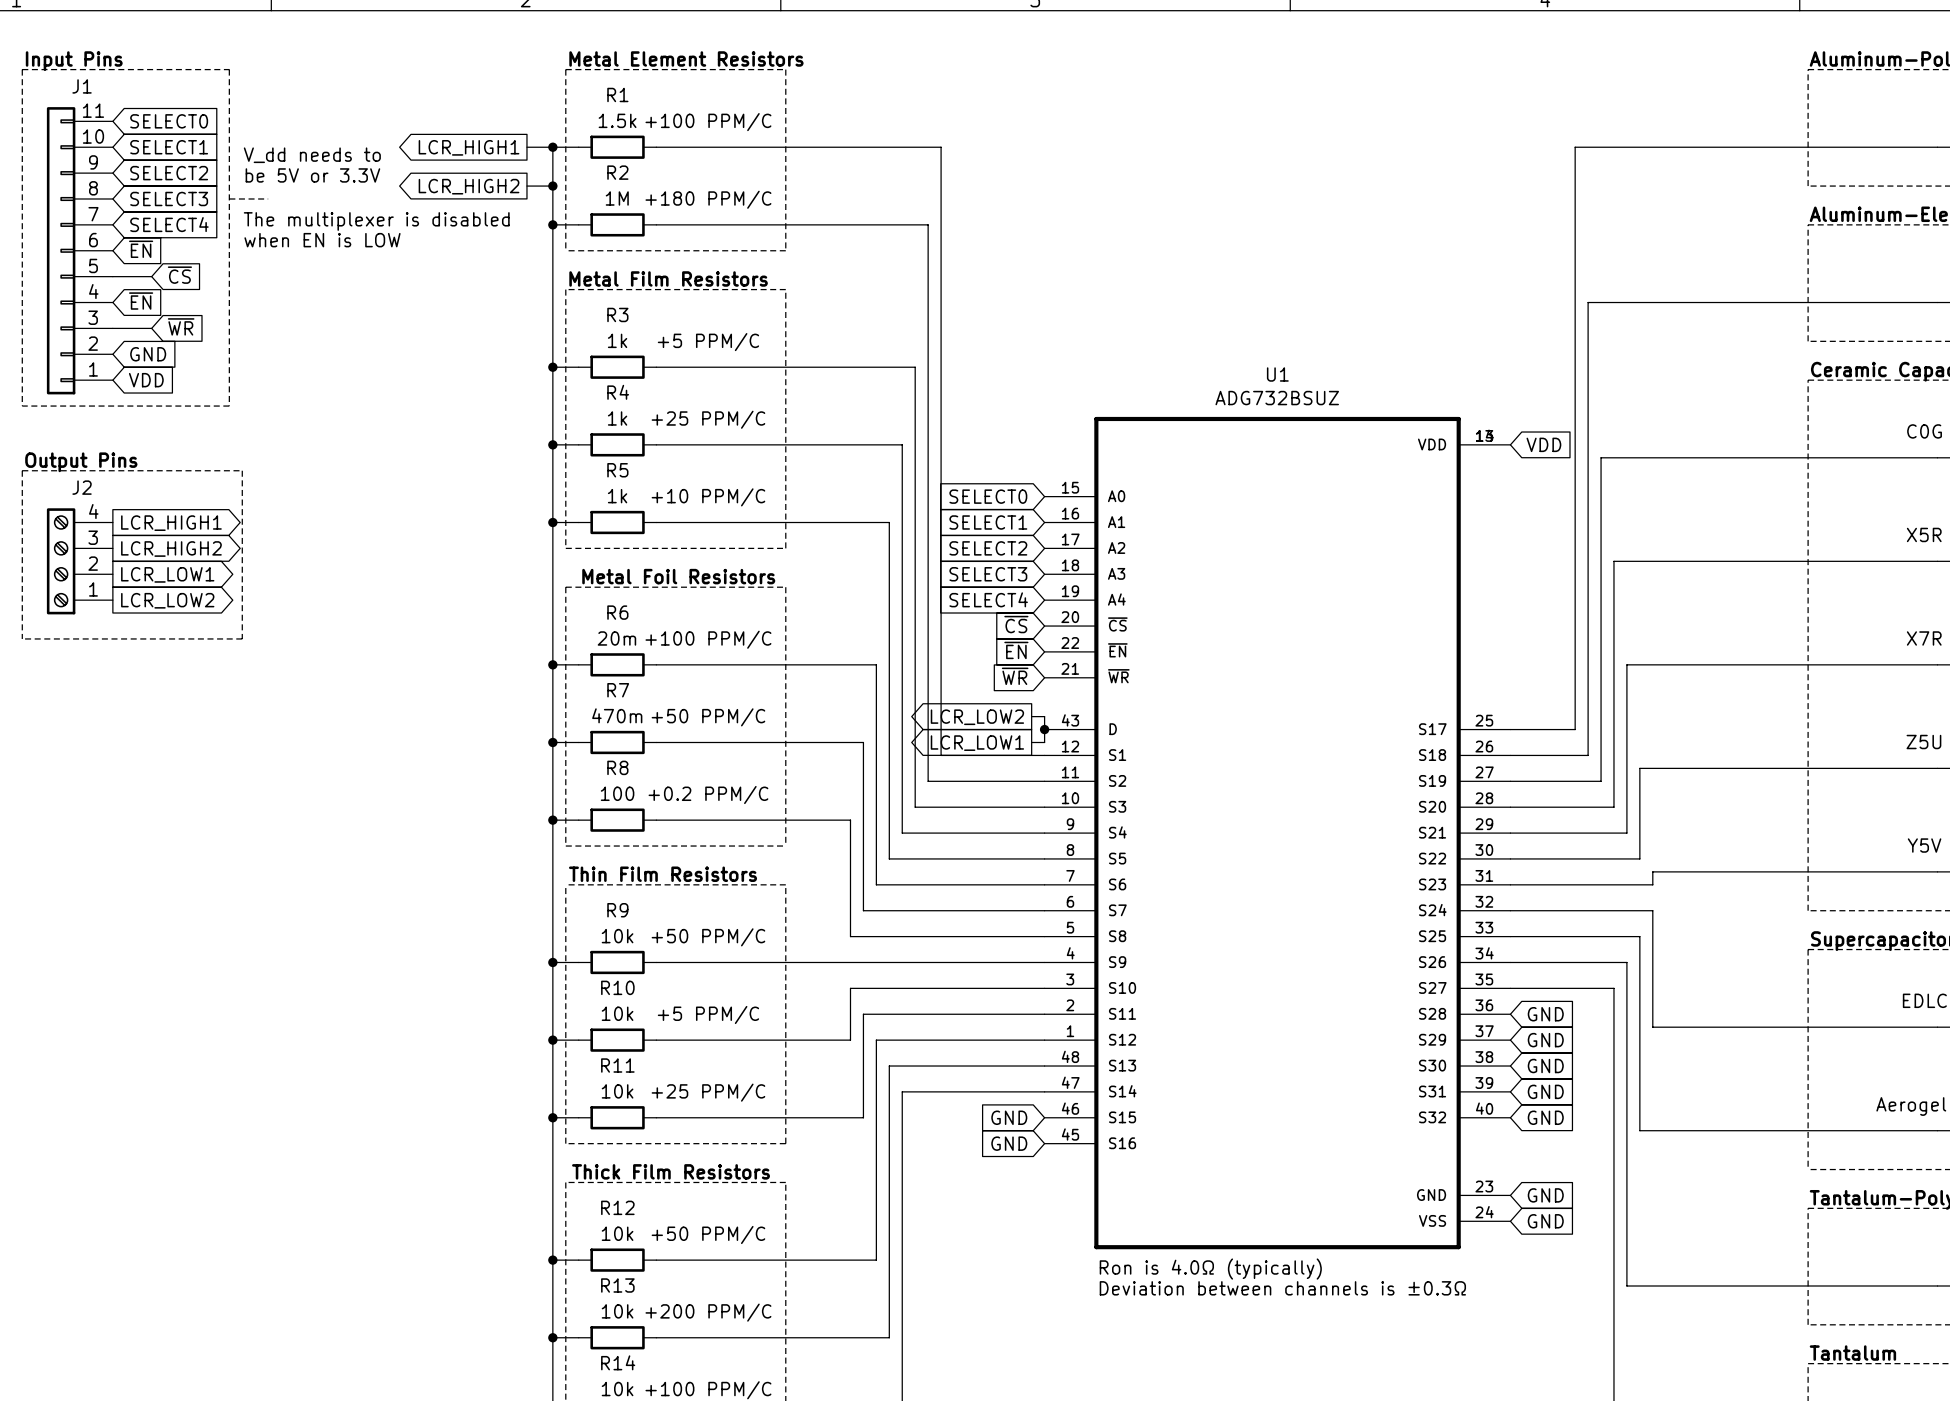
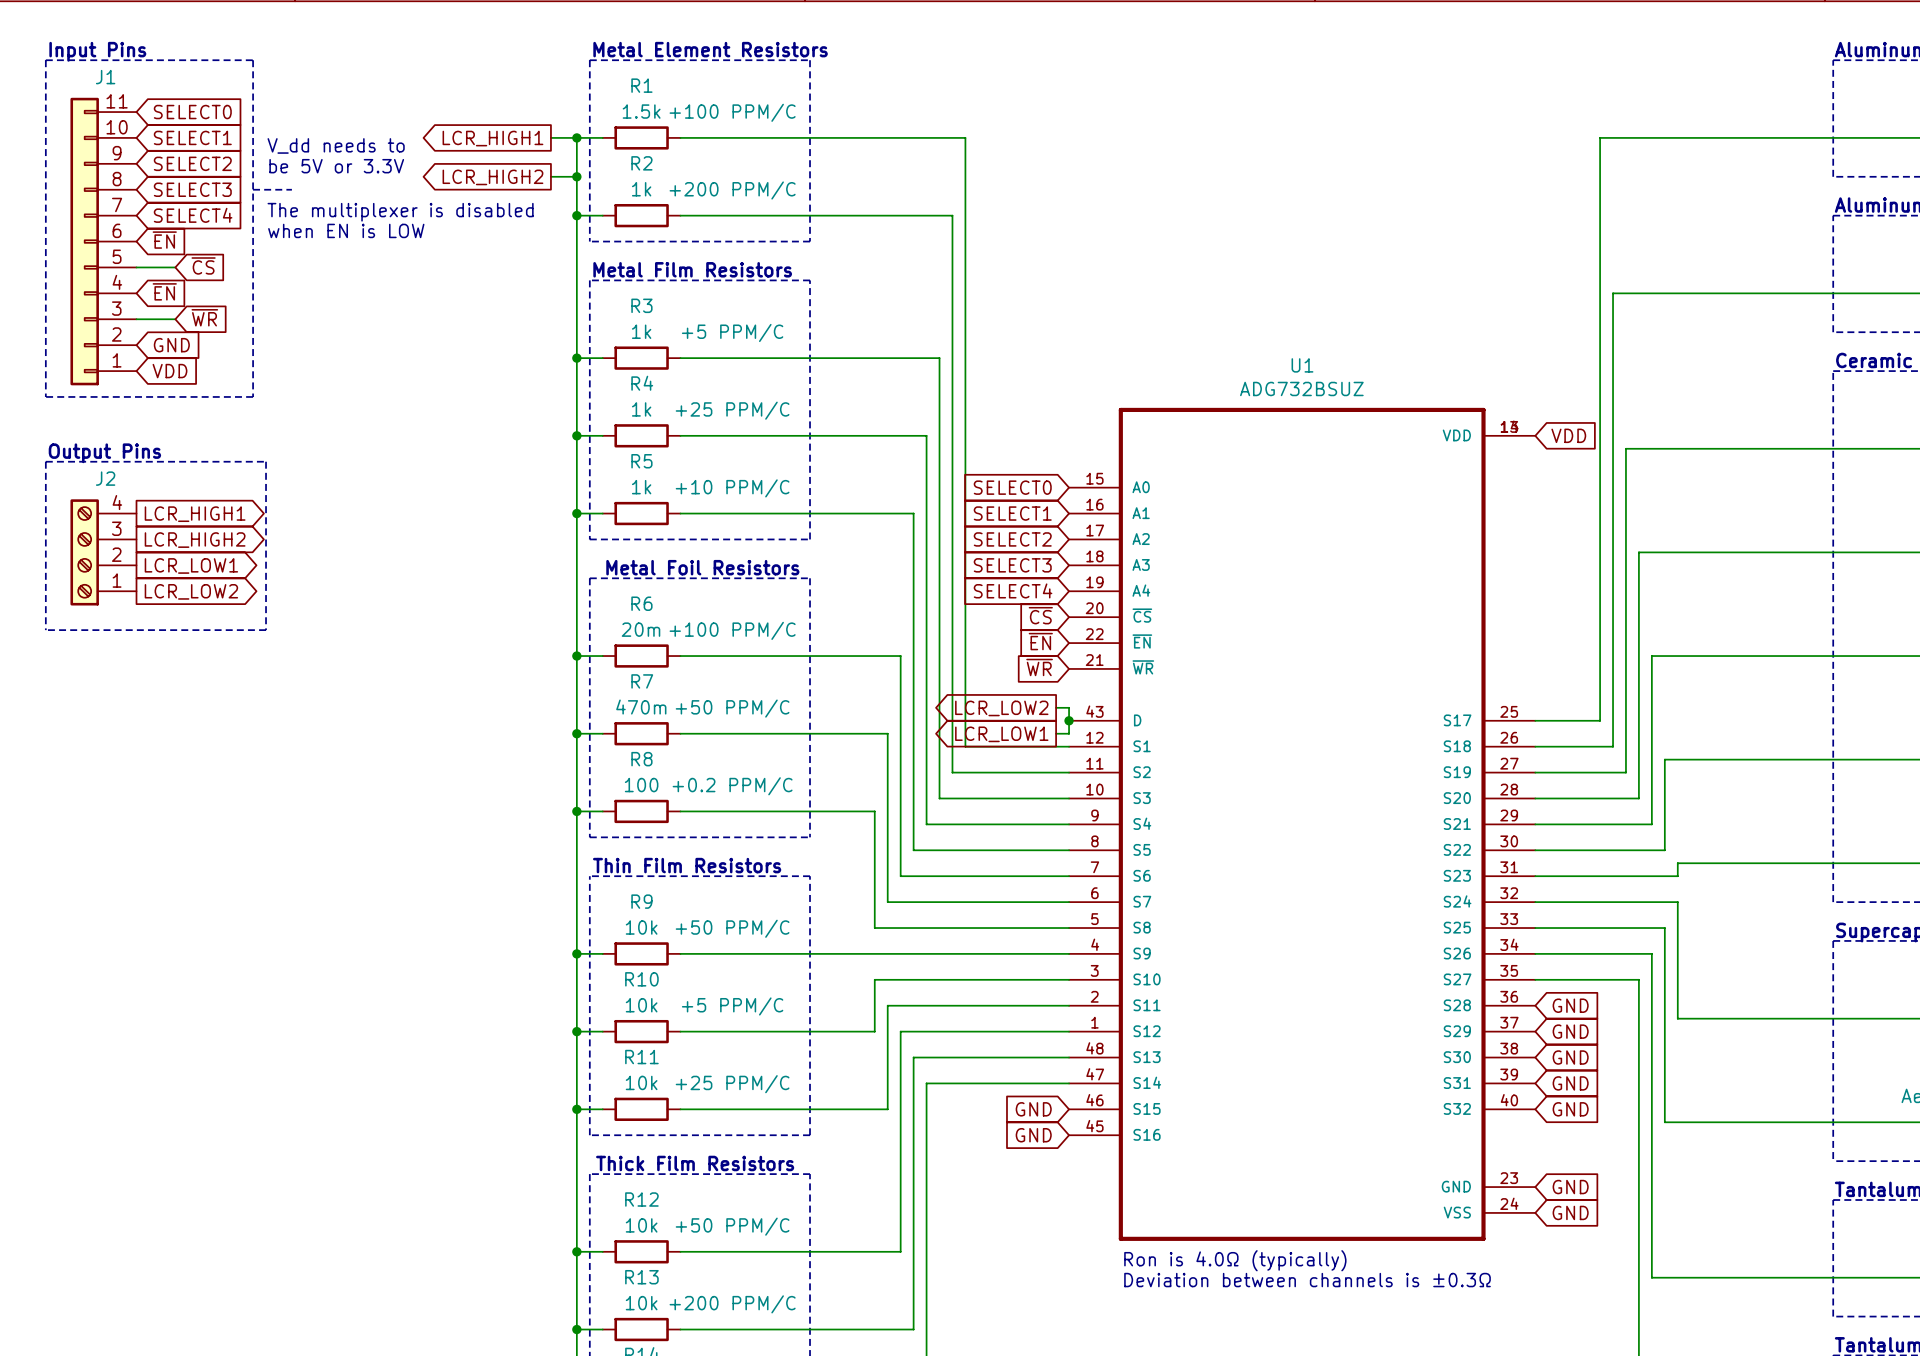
R2 value: 1M (617, 198) -> 1k (641, 189)
R2 text: +180 PPM/C (708, 199) -> +200 PPM/C (732, 190)

